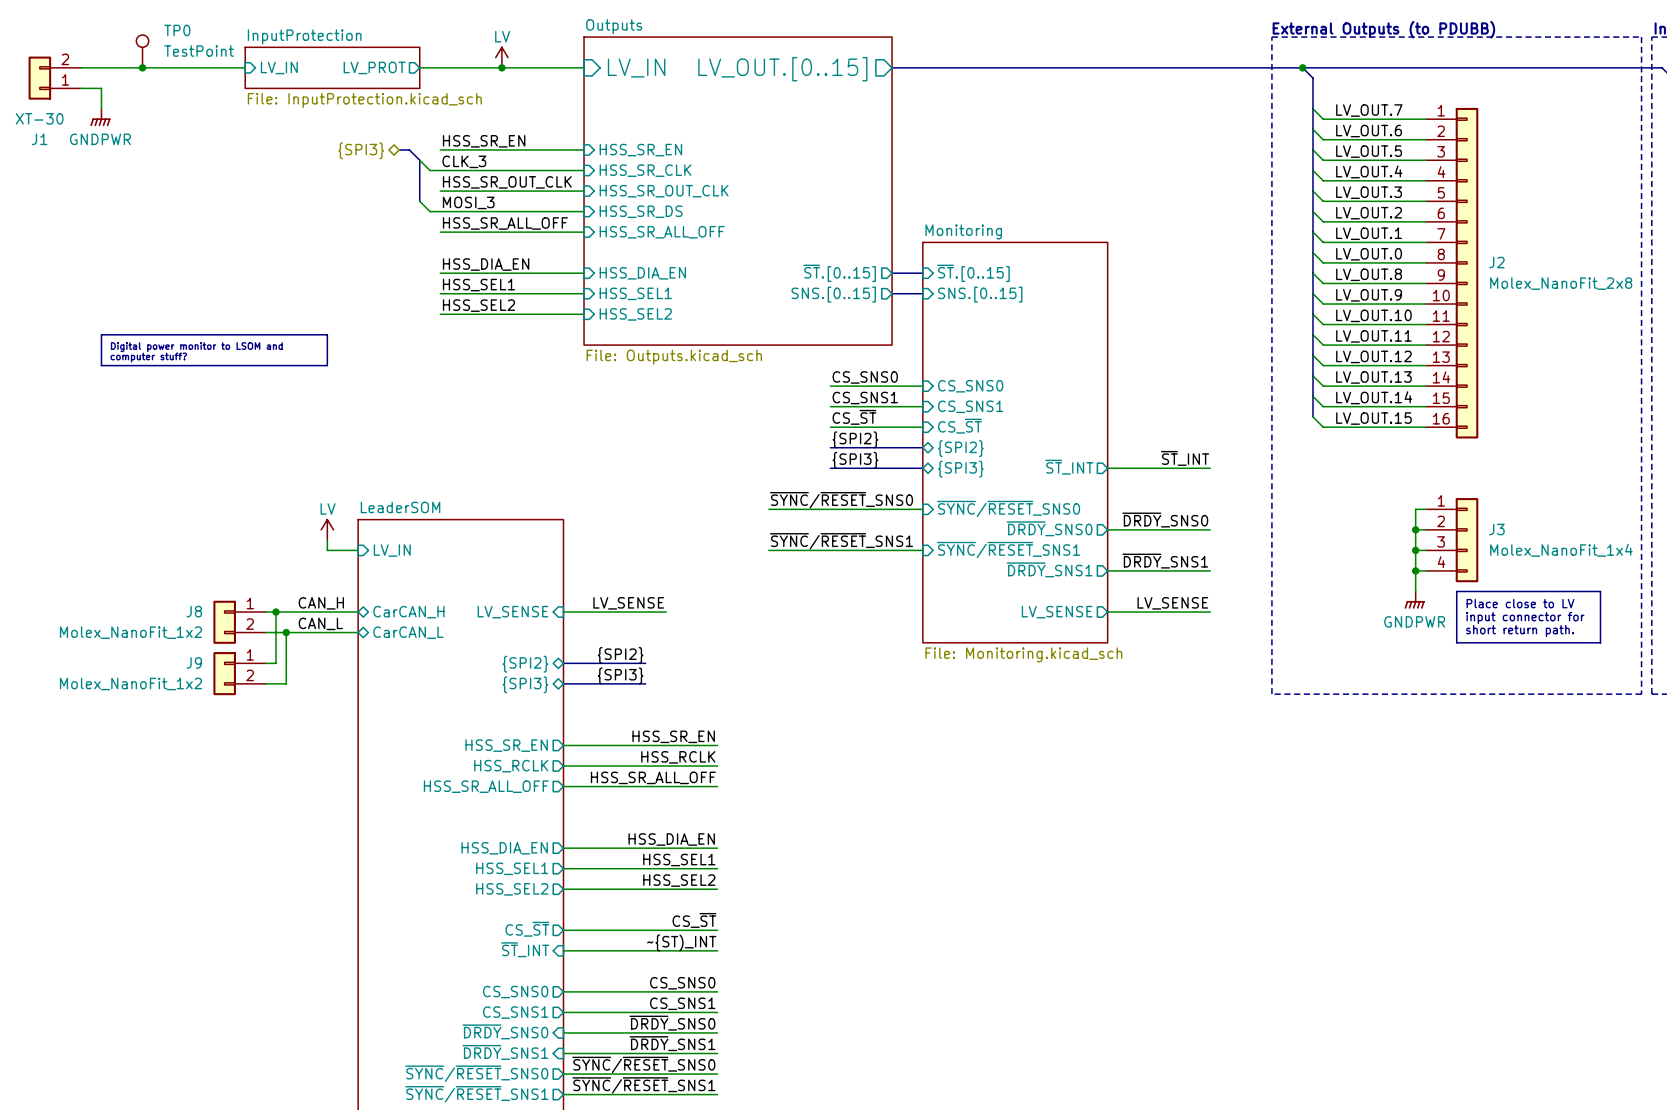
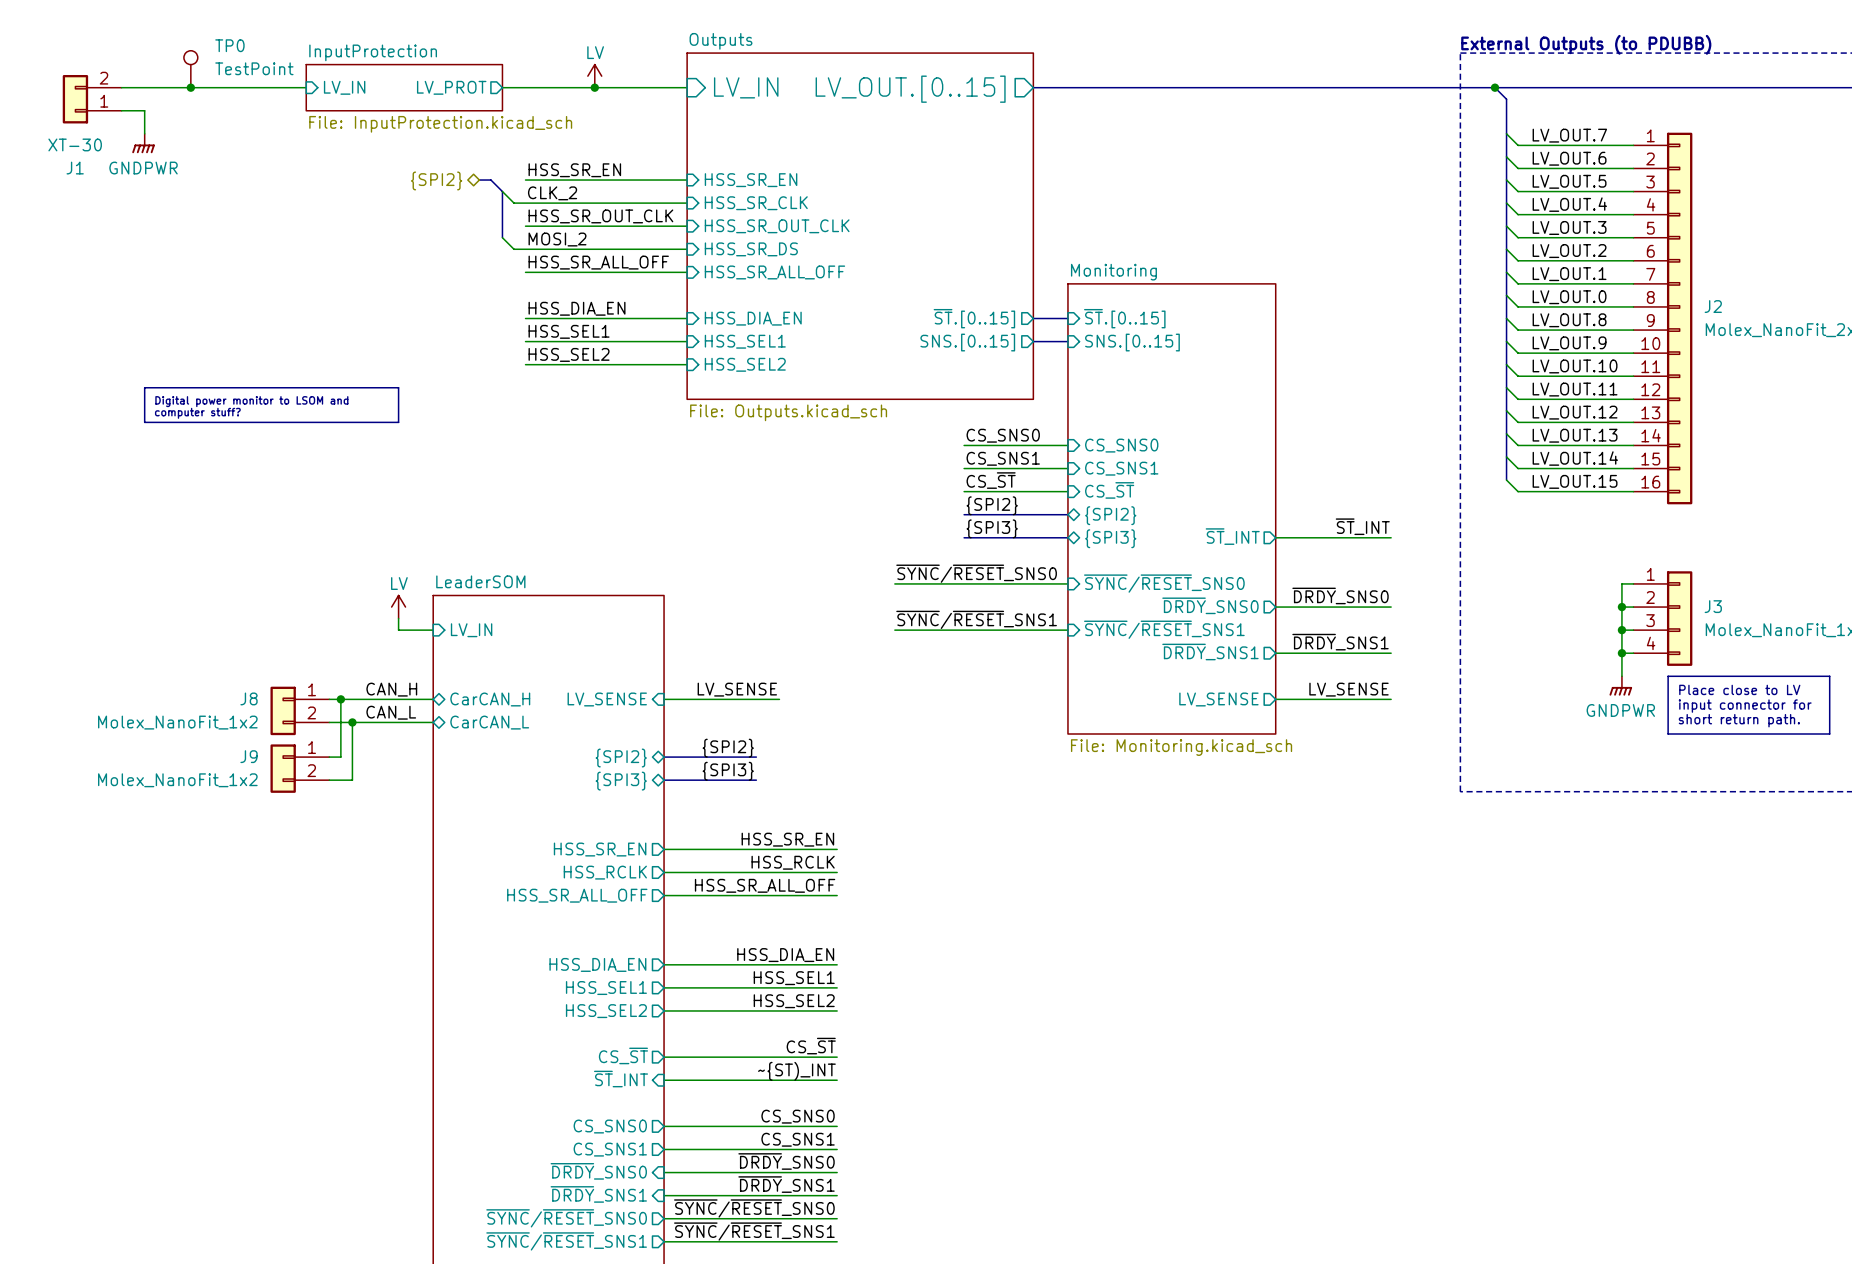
hierarchical label: {SPI3} (361, 150) -> {SPI2} (436, 180)
label: CLK_3 (464, 161) -> CLK_2 (552, 193)
label: MOSI_3 (468, 202) -> MOSI_2 (557, 239)

